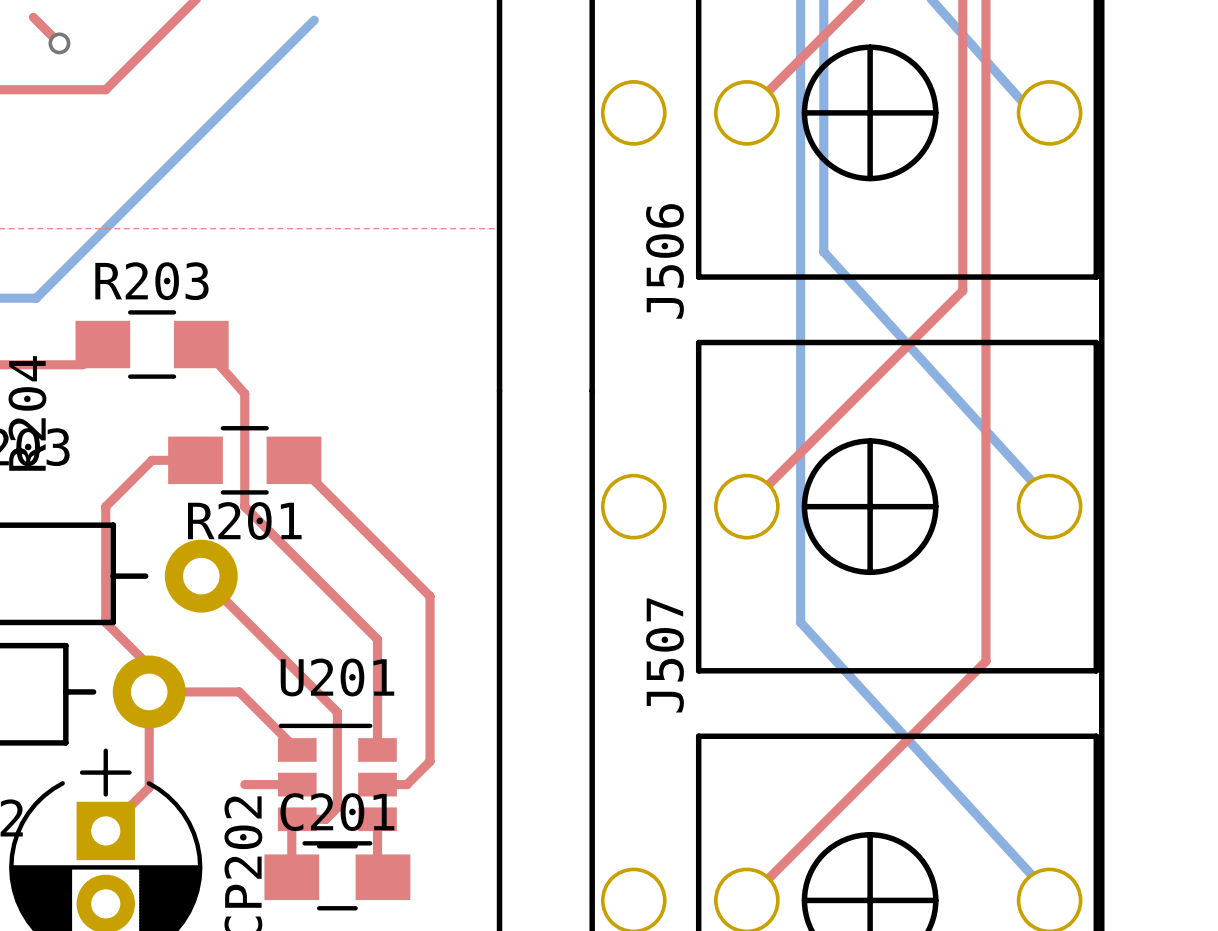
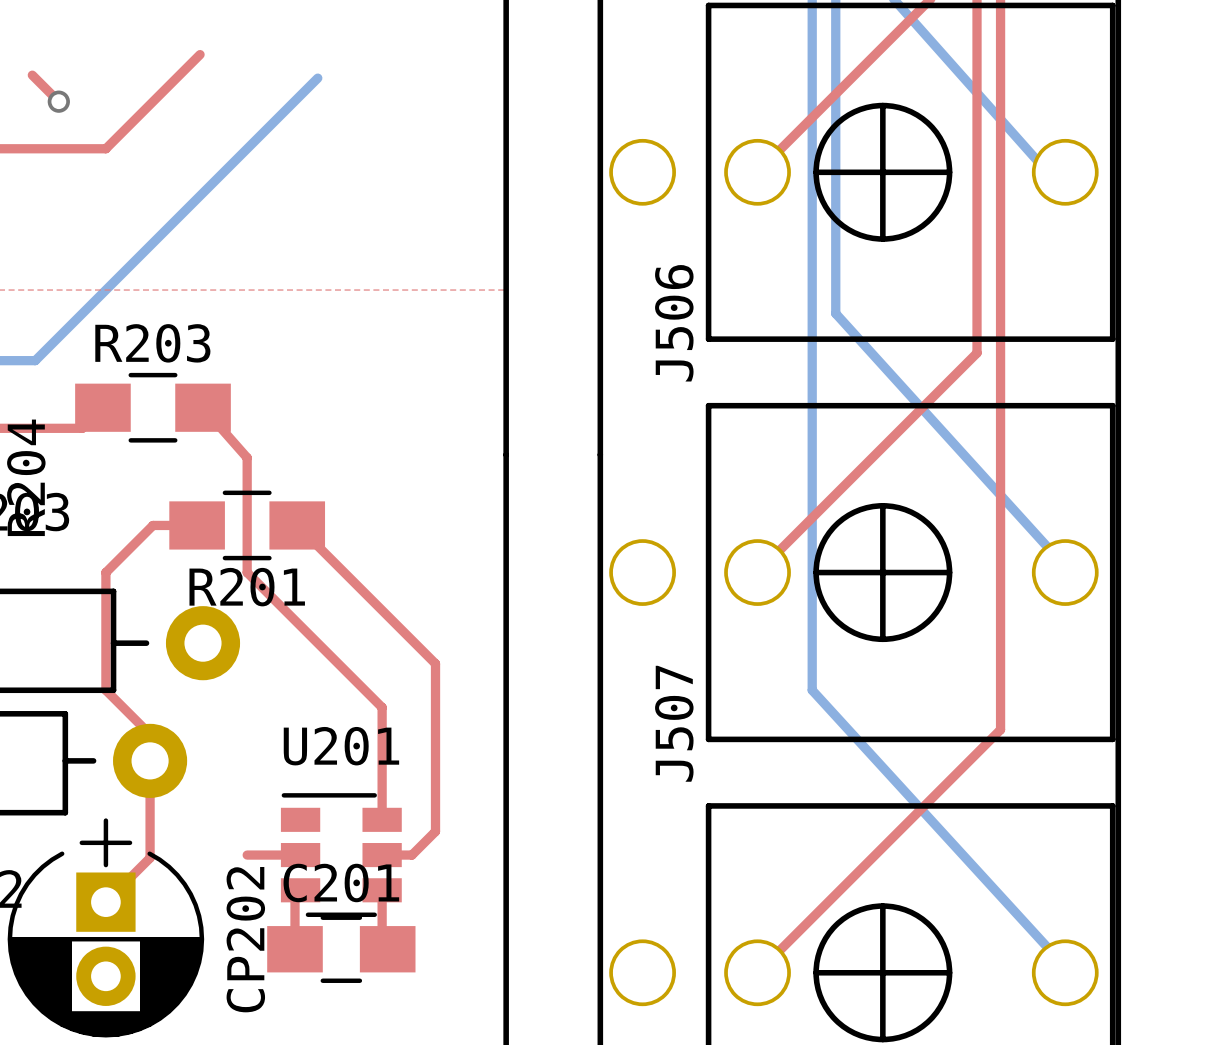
top track: (201, 576) (337, 712) (337, 807) (325, 819) (297, 819) (291, 824) -> none
top track: (149, 691) (239, 691) (297, 749) -> none

